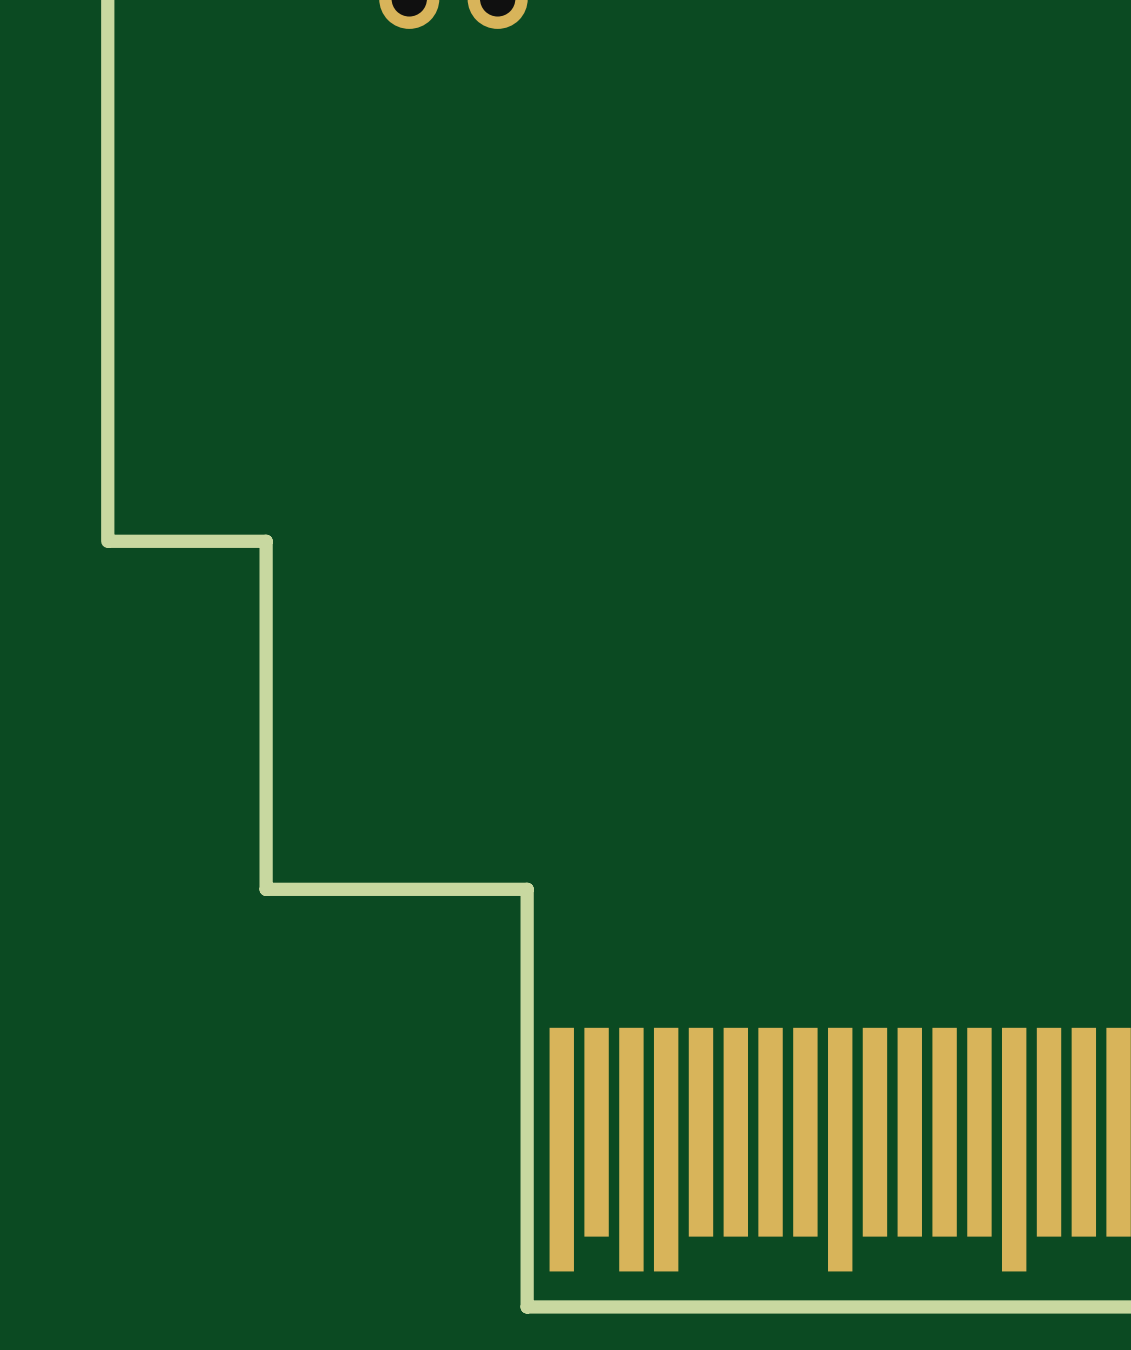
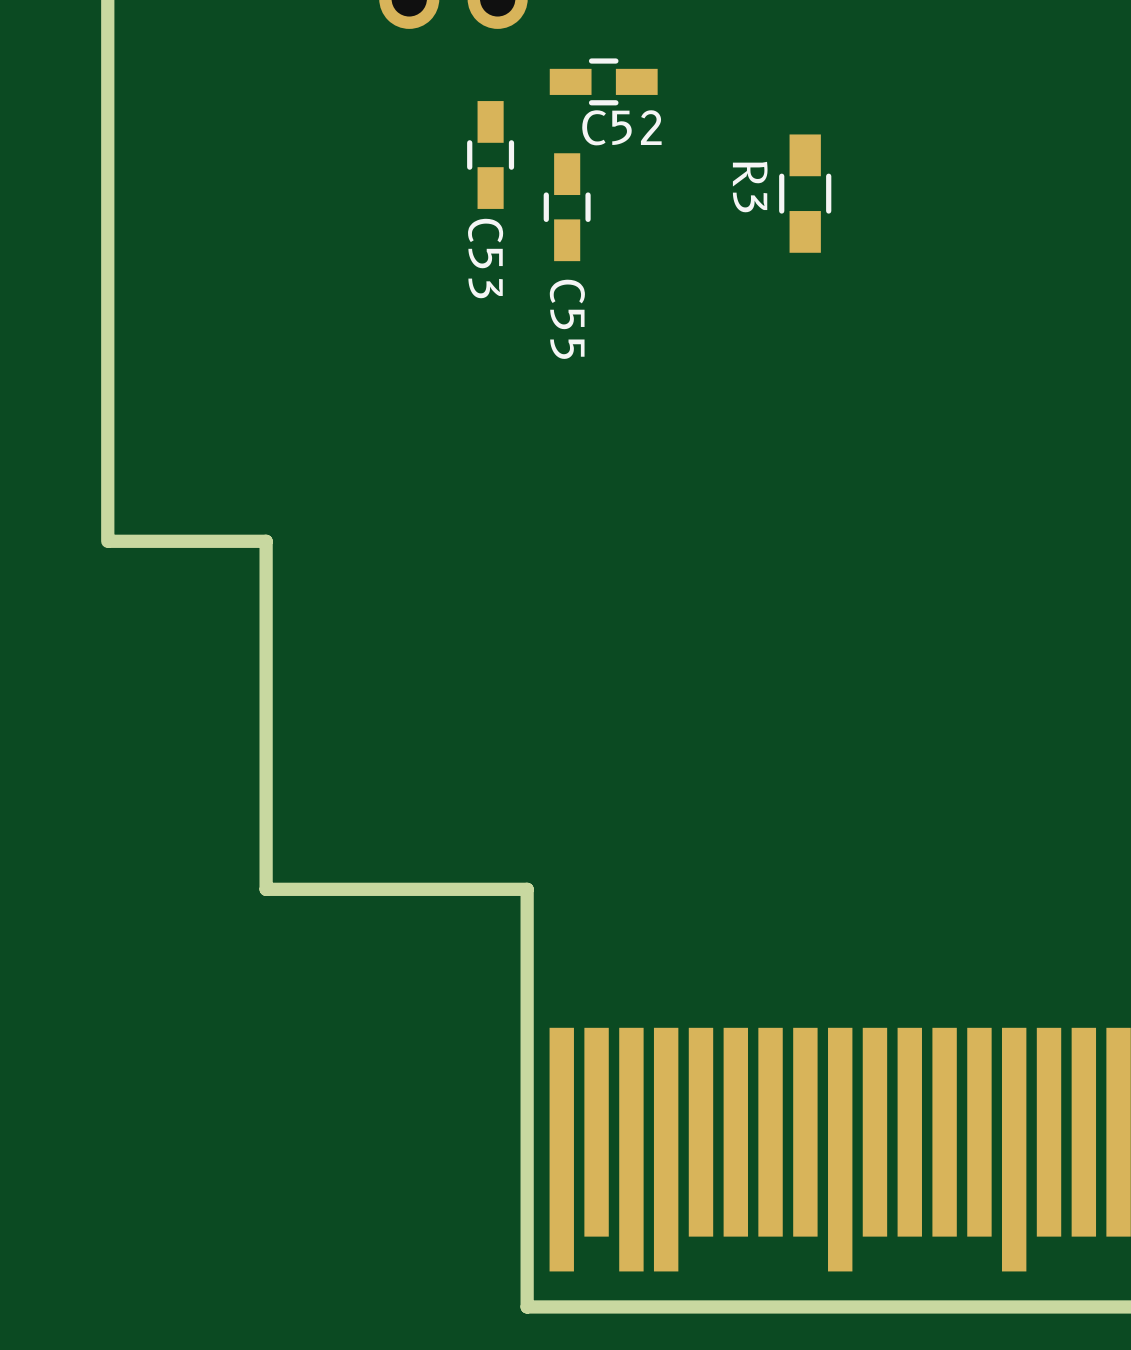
C52: none -> (603, 81)
C53: none -> (490, 154)
R3: none -> (805, 193)
C55: none -> (567, 207)

